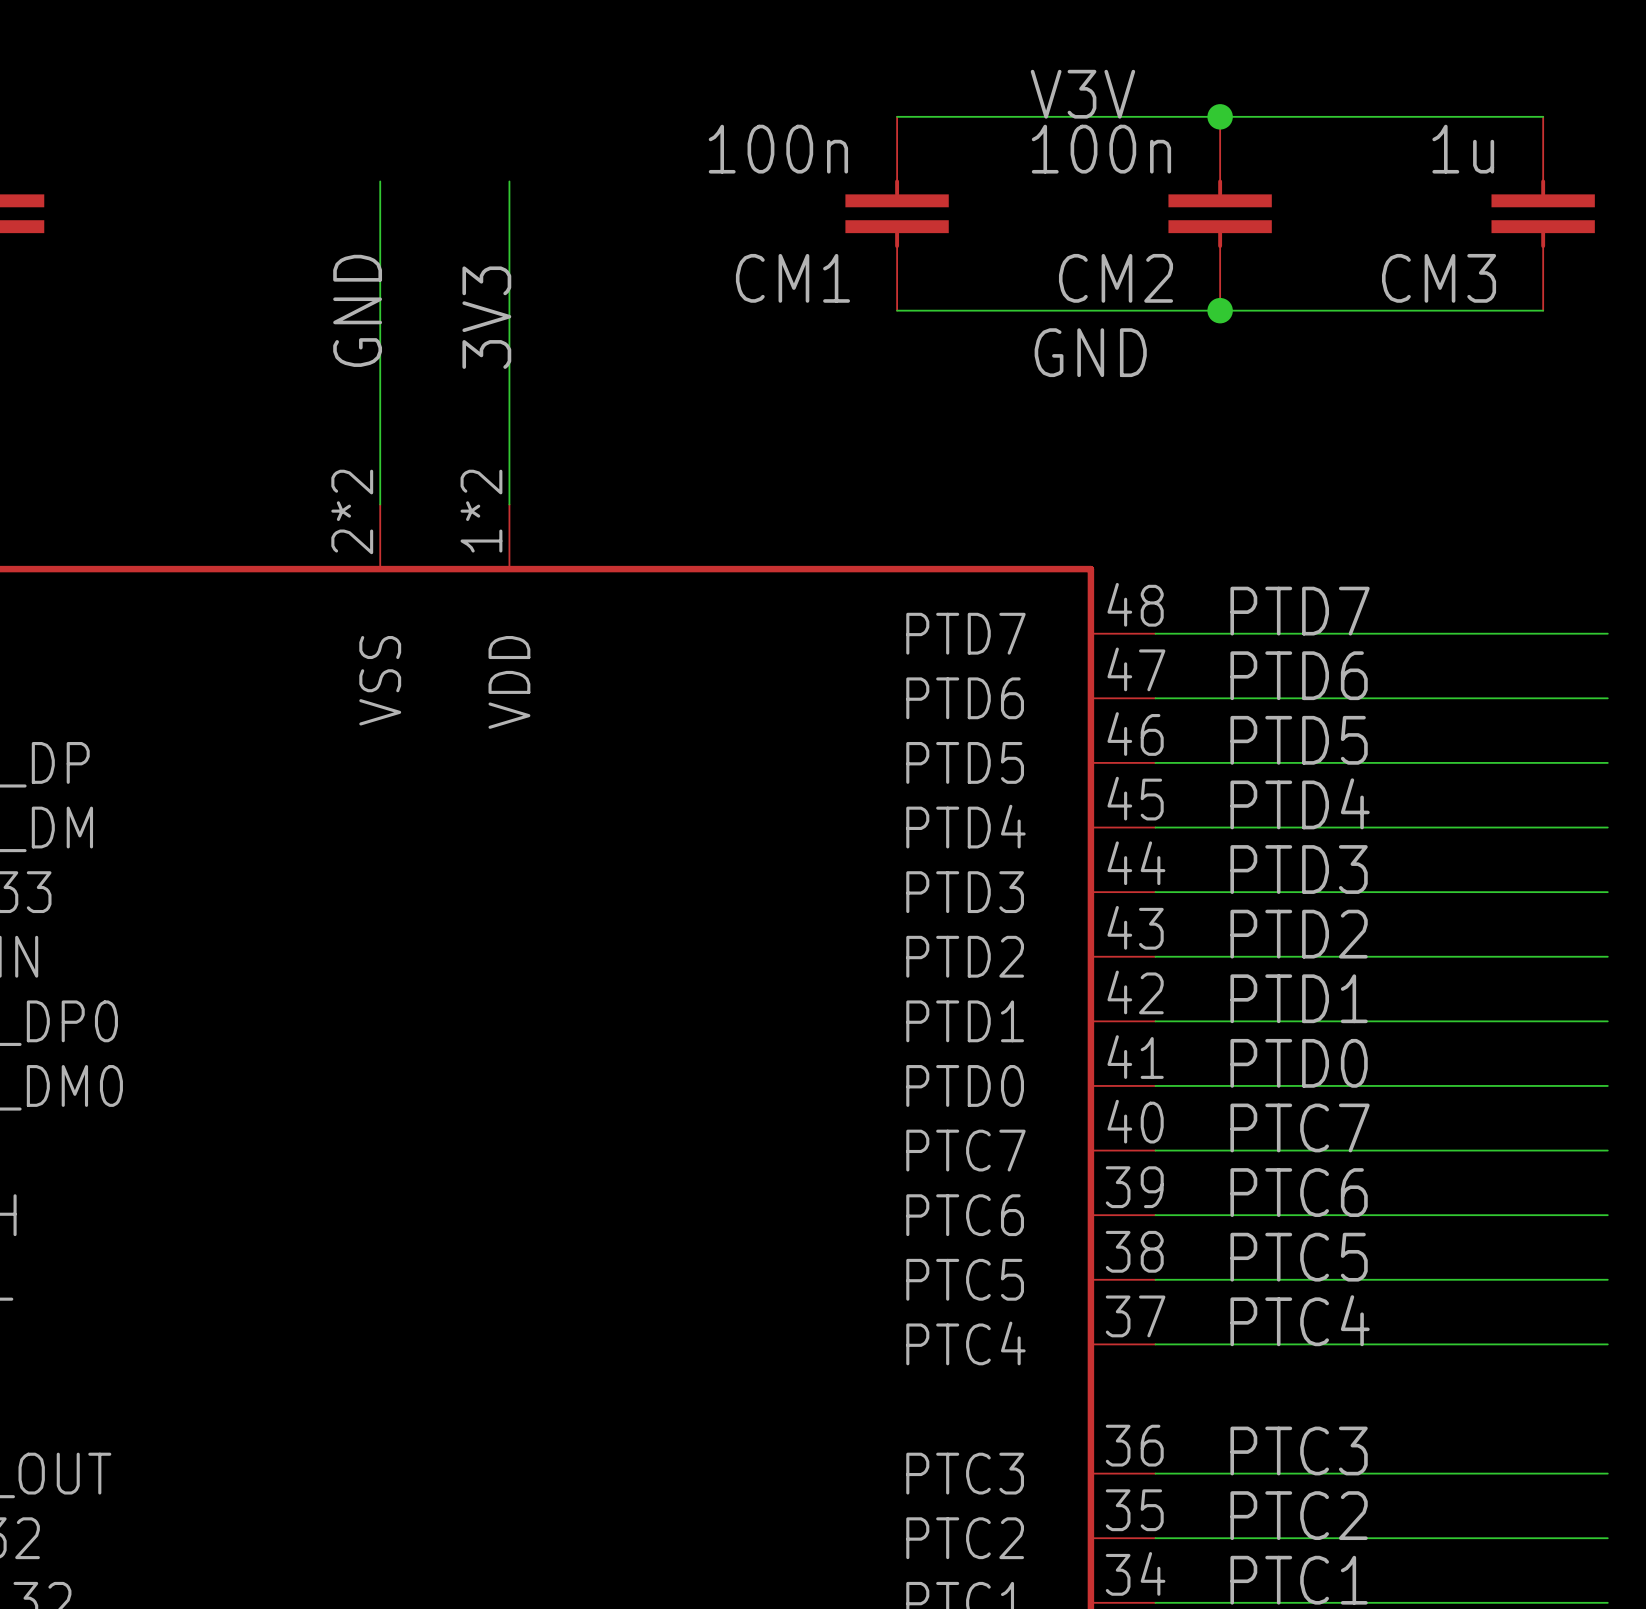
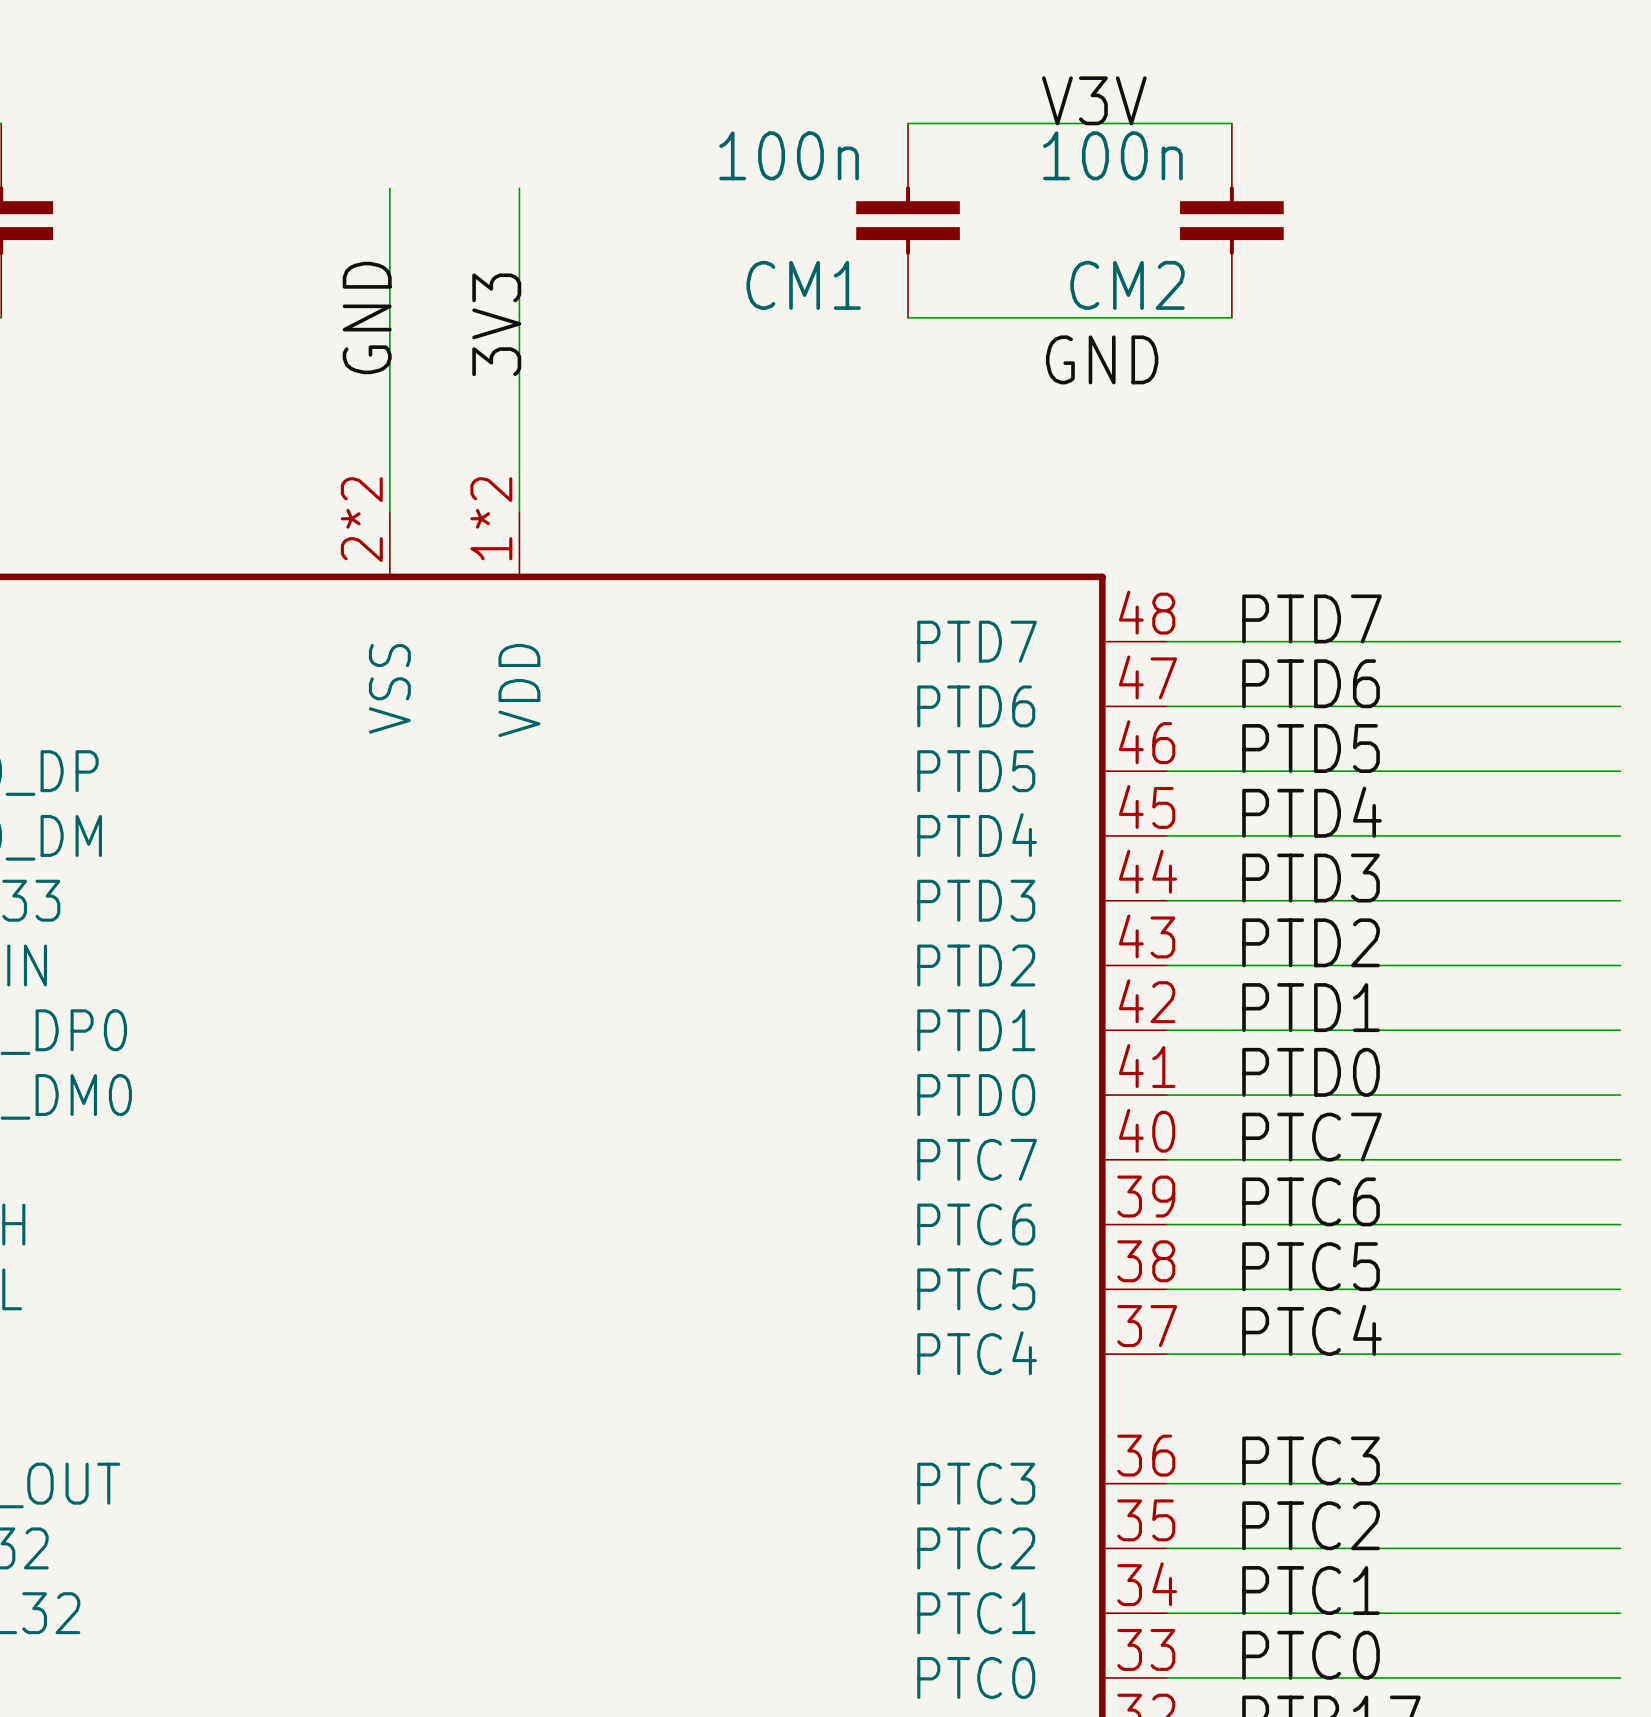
wire: (1220, 116) (1543, 116) -> none
junction: (1220, 116) -> none
CM3: 1u (1543, 213) -> none
wire: (1220, 310) (1543, 310) -> none
junction: (1220, 310) -> none

